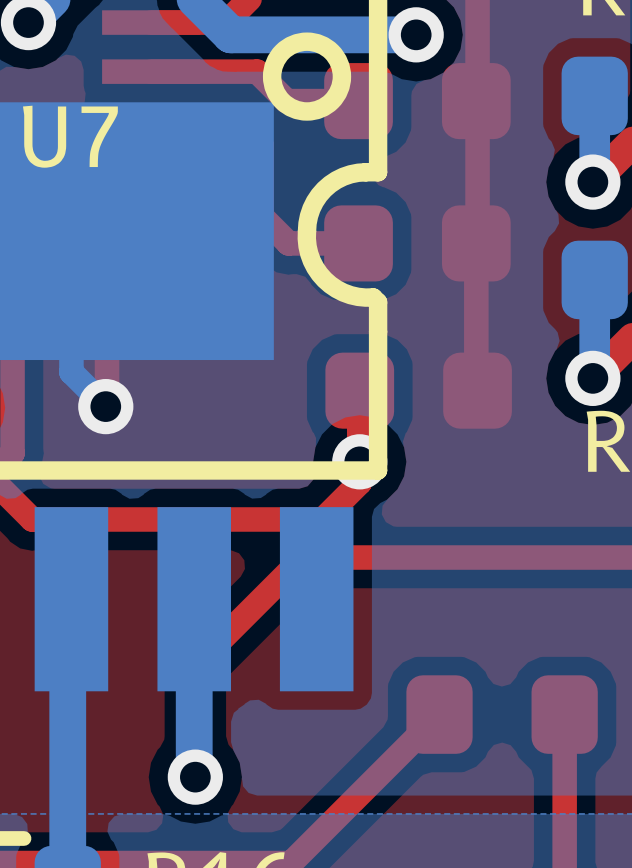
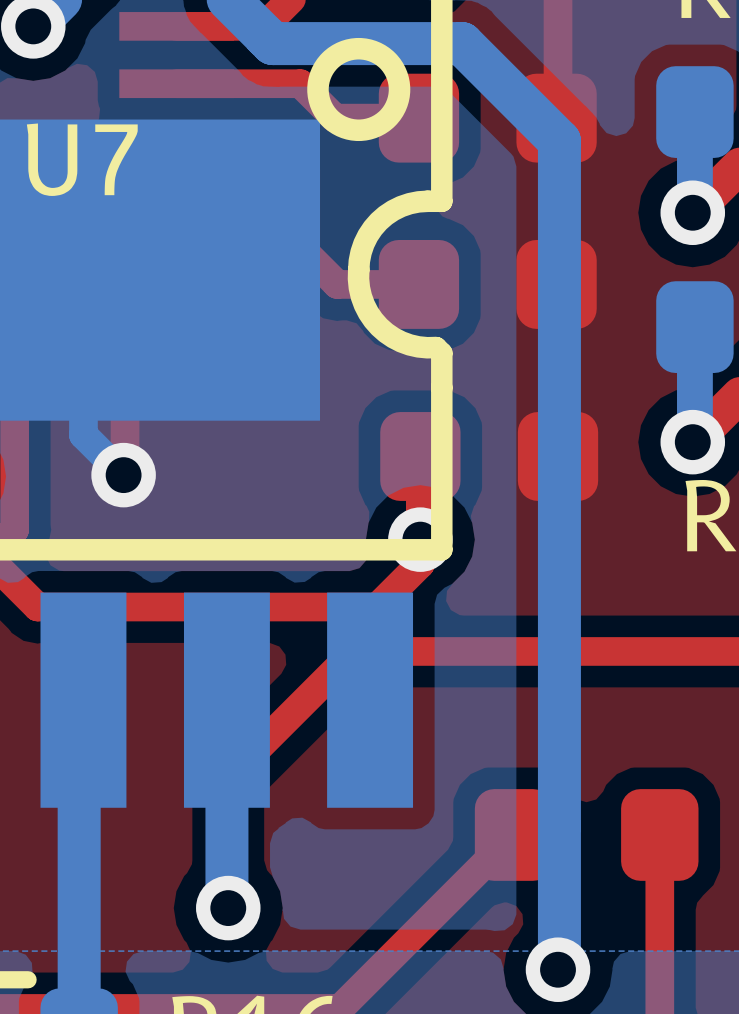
bottom track: (416, 34) (230, 34) -> (559, 968) (559, 141) (461, 43) (272, 43) (269, 40)
via: (416, 34) -> none
via: none -> (558, 969)

